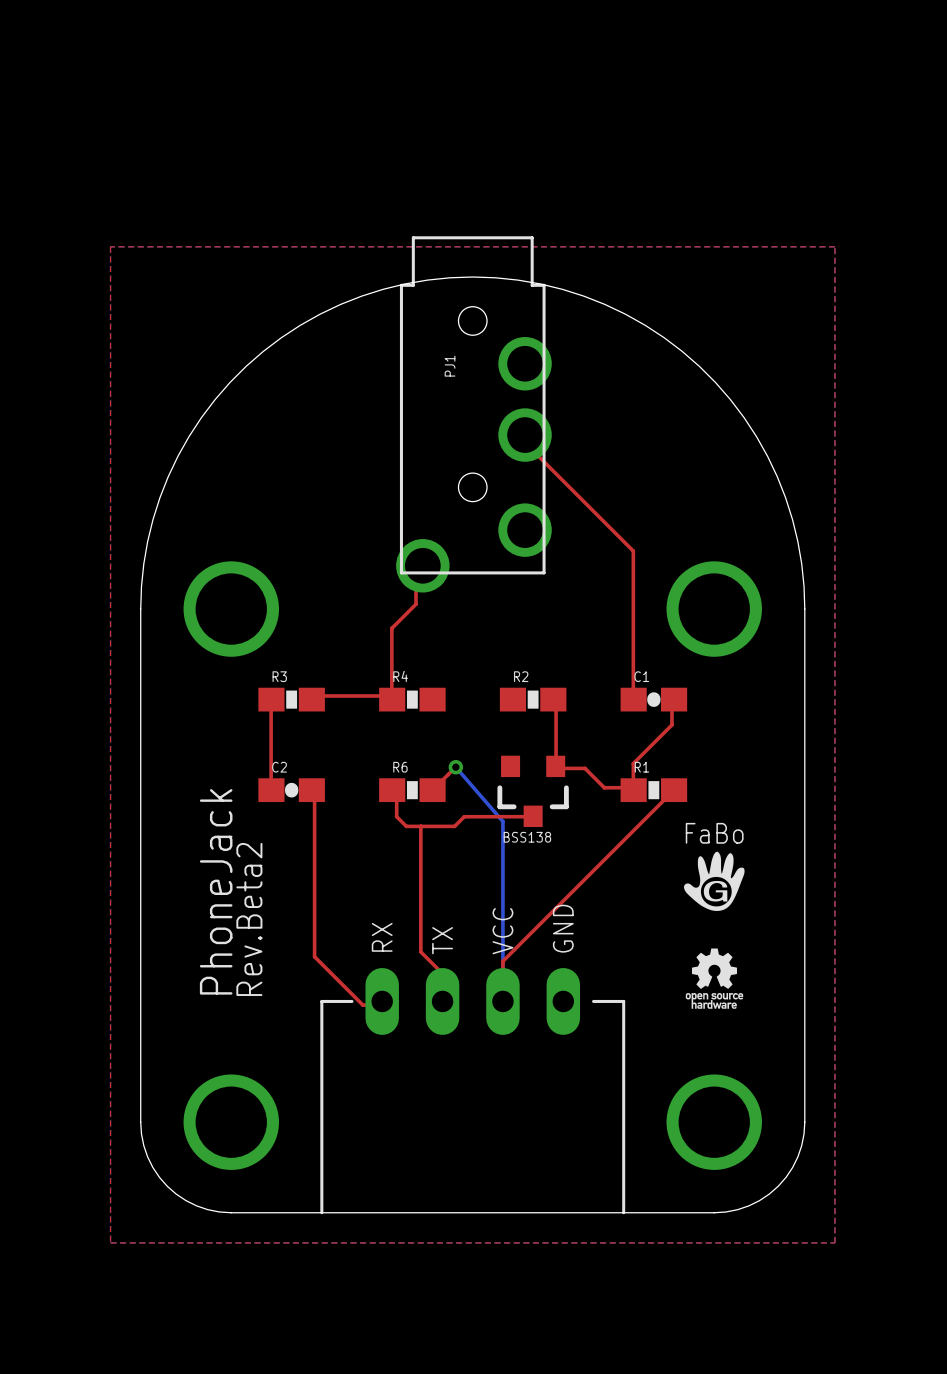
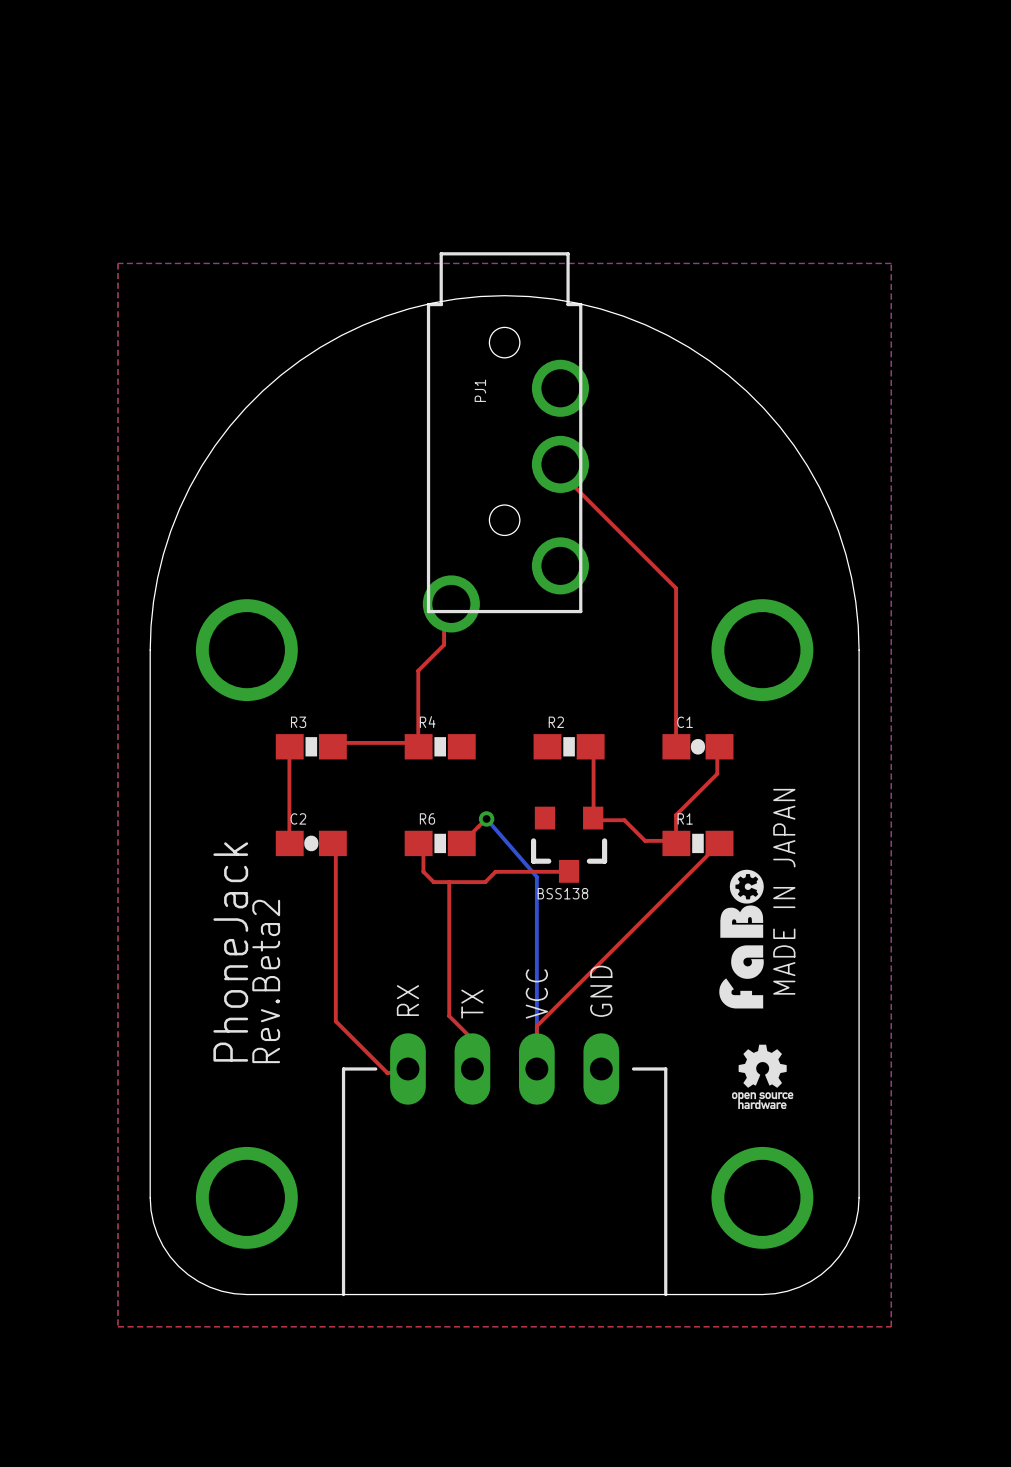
drawing shape: [683, 822, 745, 911] -> [719, 869, 764, 1009]
text: none -> MADE IN JAPAN (784, 891)
drawing position: (714, 978) -> (762, 1076)

